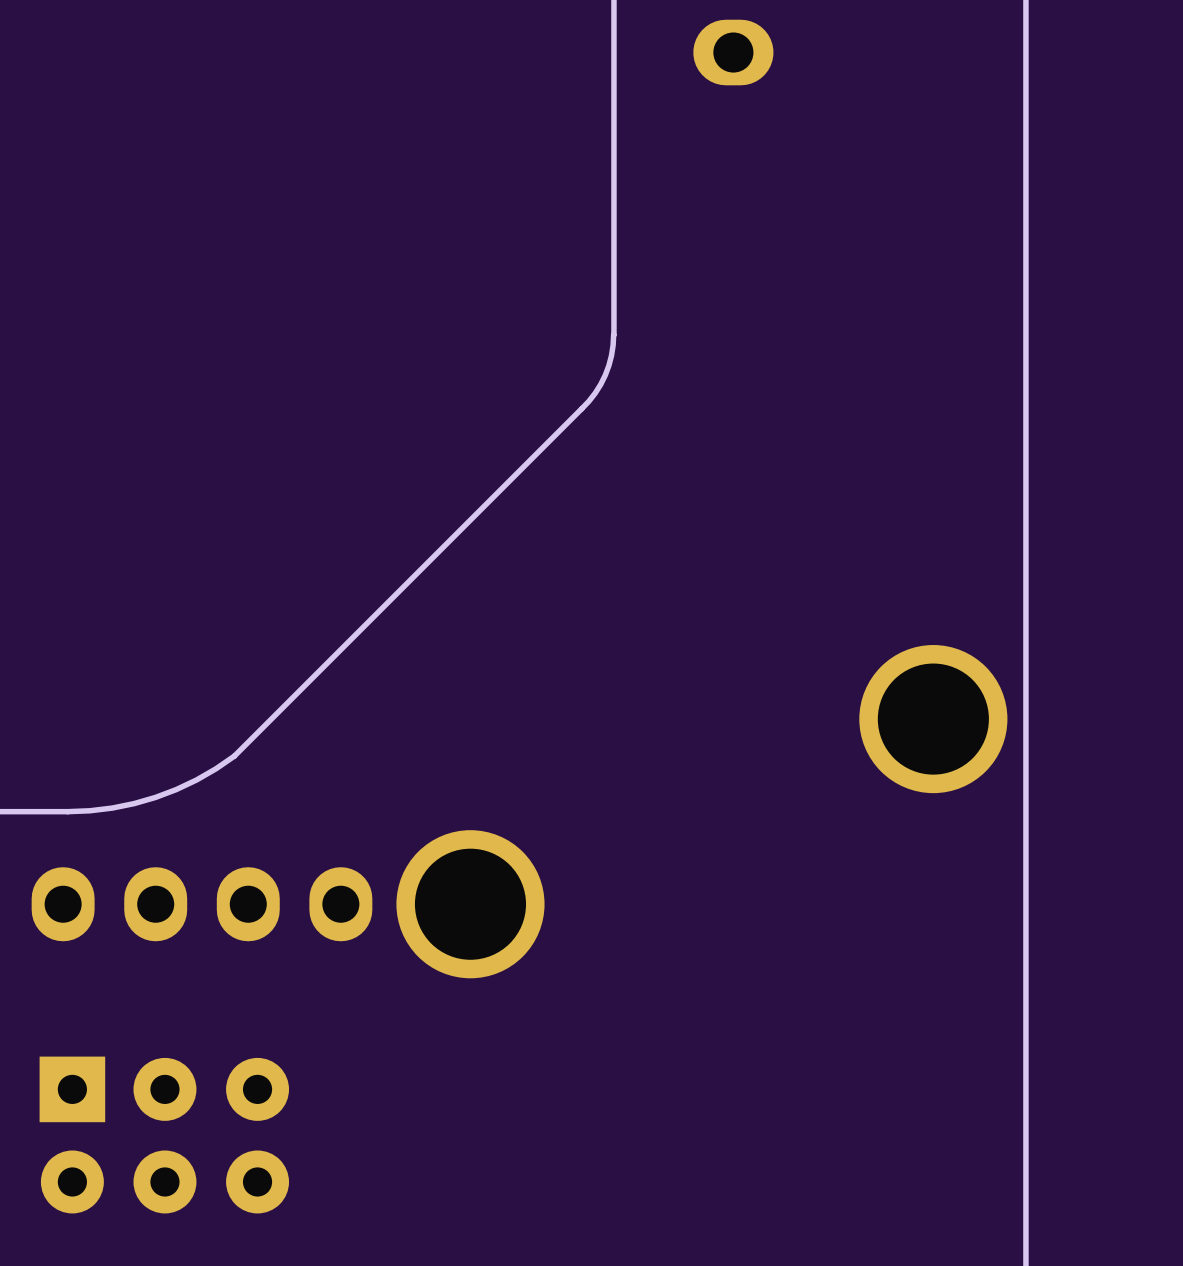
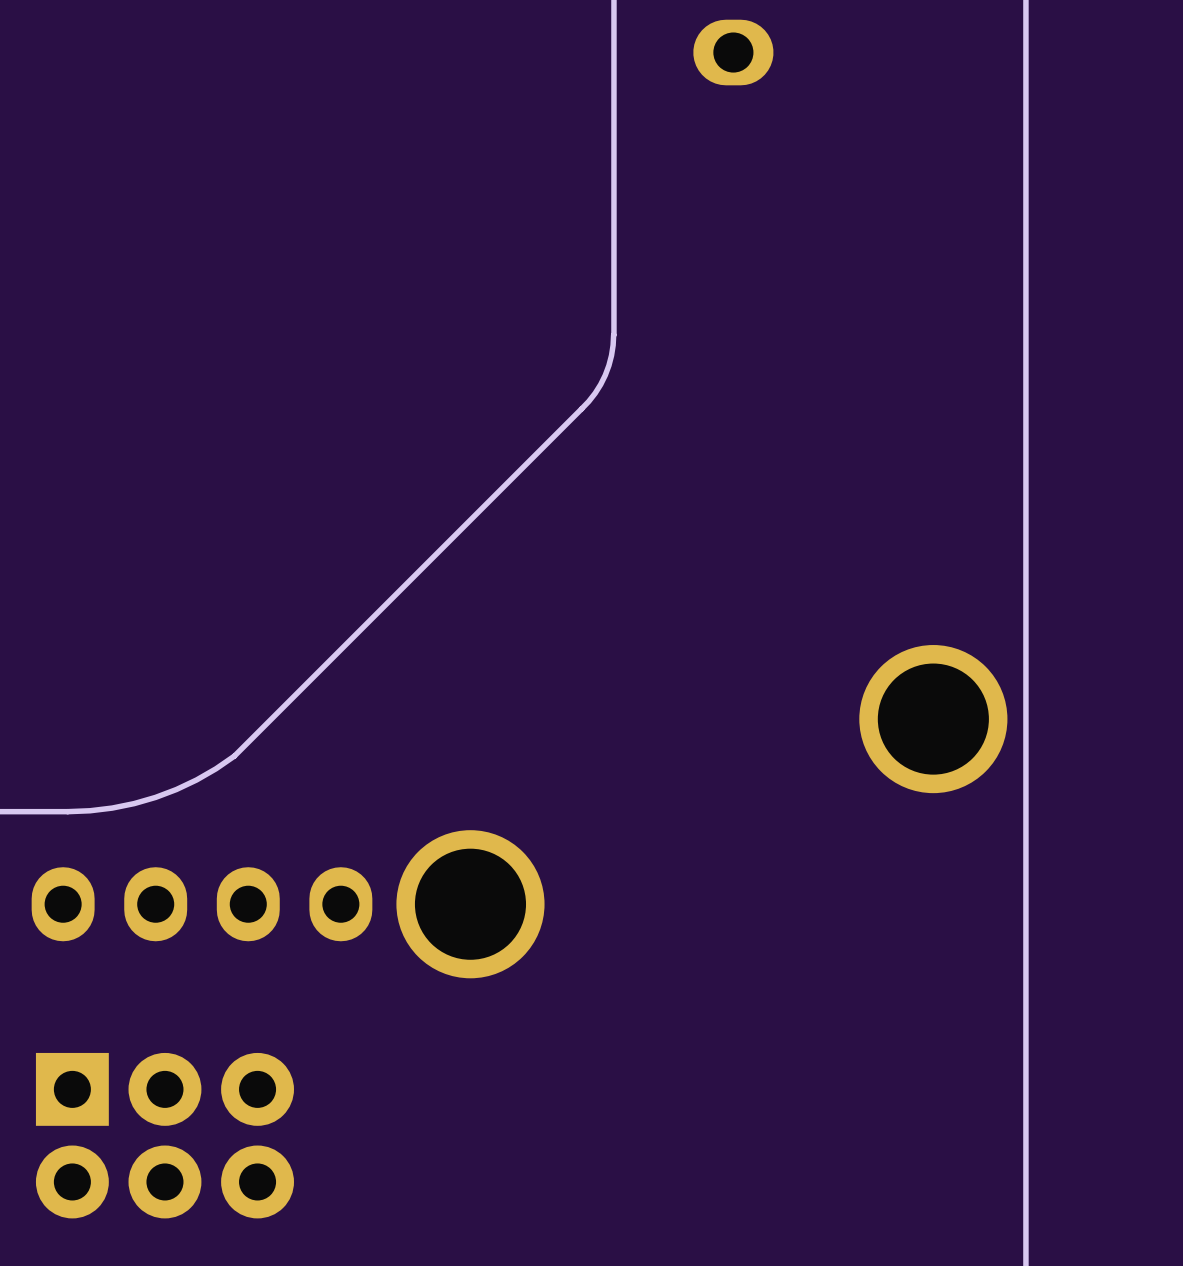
part footprint: [39, 1056, 290, 1214] -> [35, 1052, 294, 1219]

